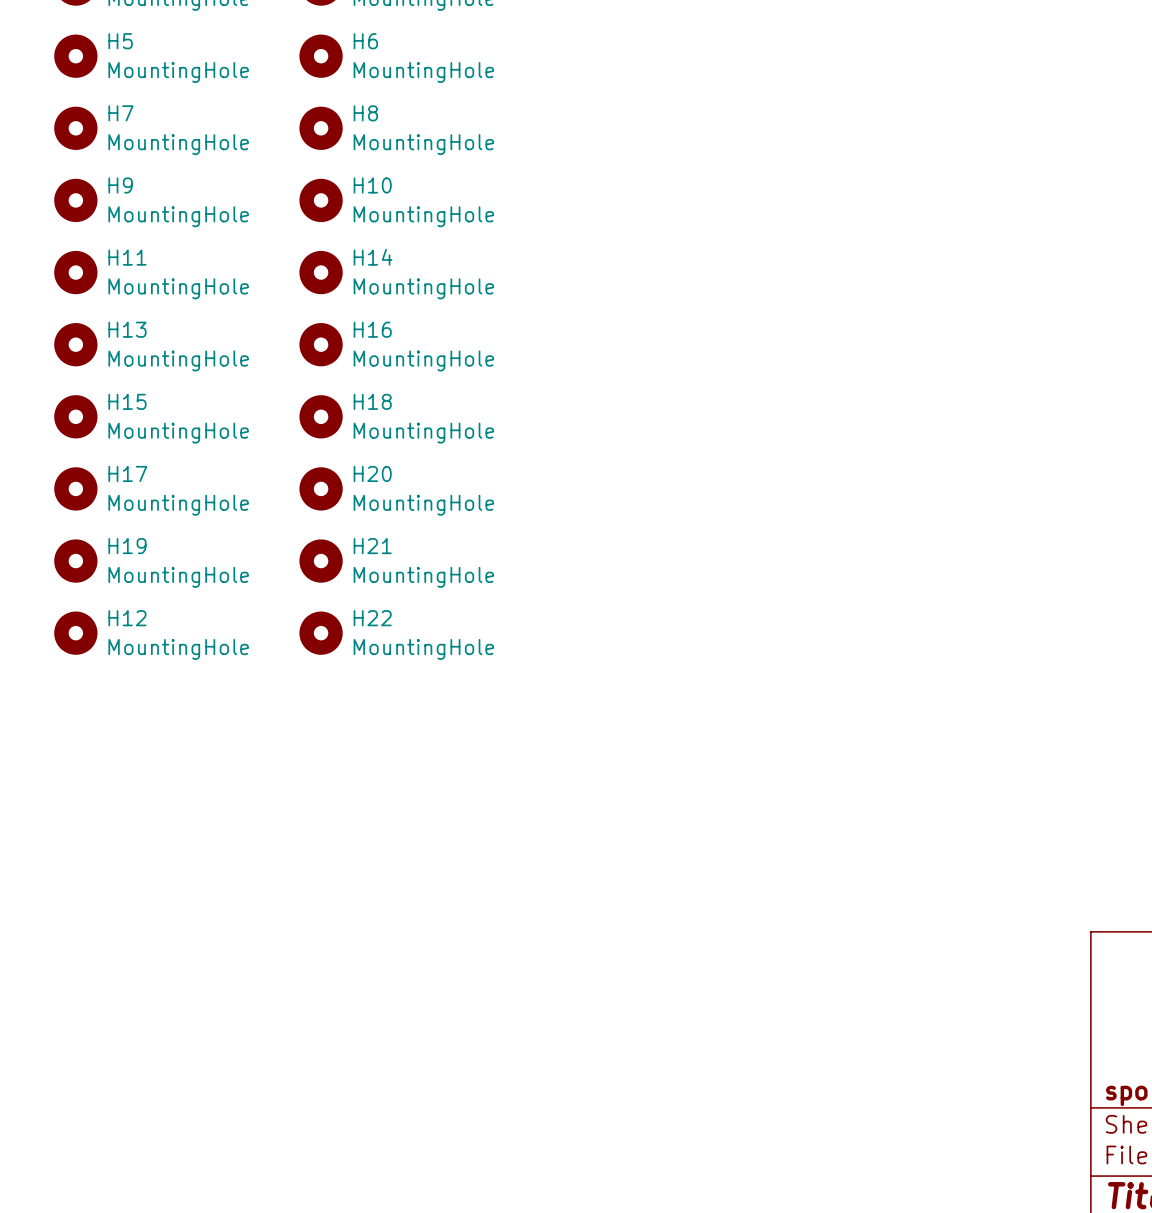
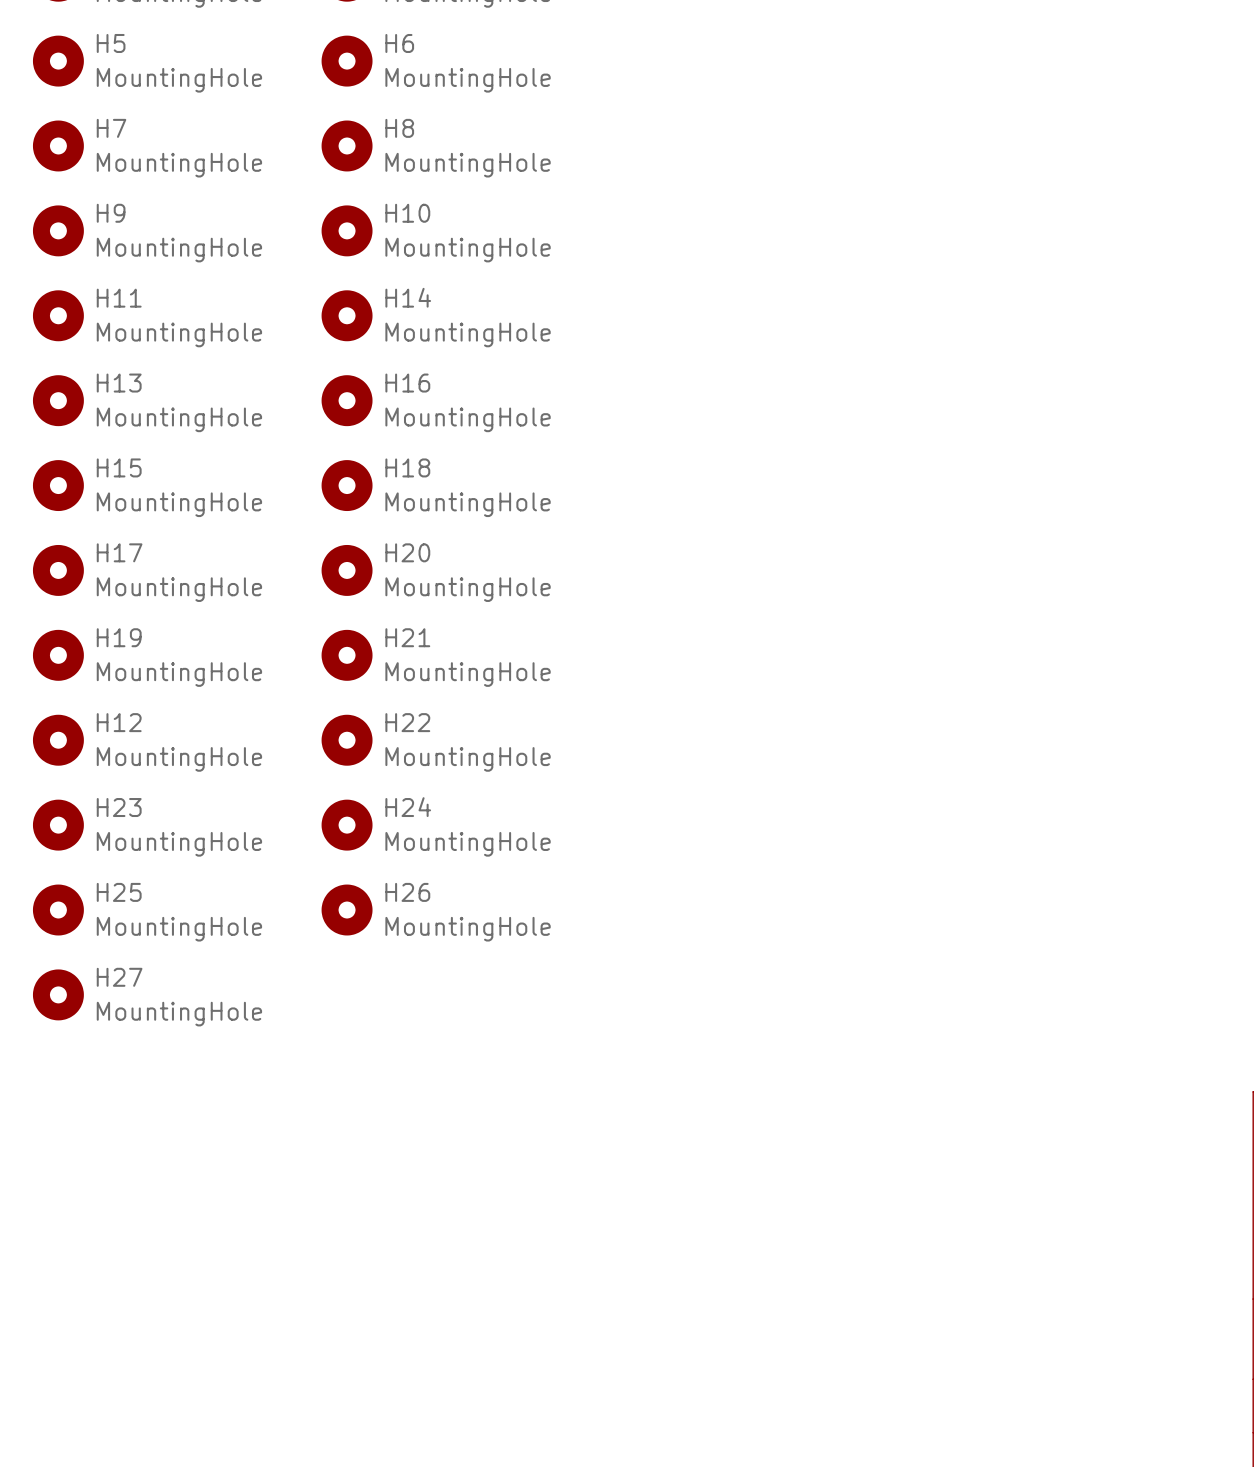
H23: none -> MountingHole (58, 825)
H24: none -> MountingHole (347, 825)
H25: none -> MountingHole (58, 910)
H26: none -> MountingHole (347, 910)
H27: none -> MountingHole (58, 994)

